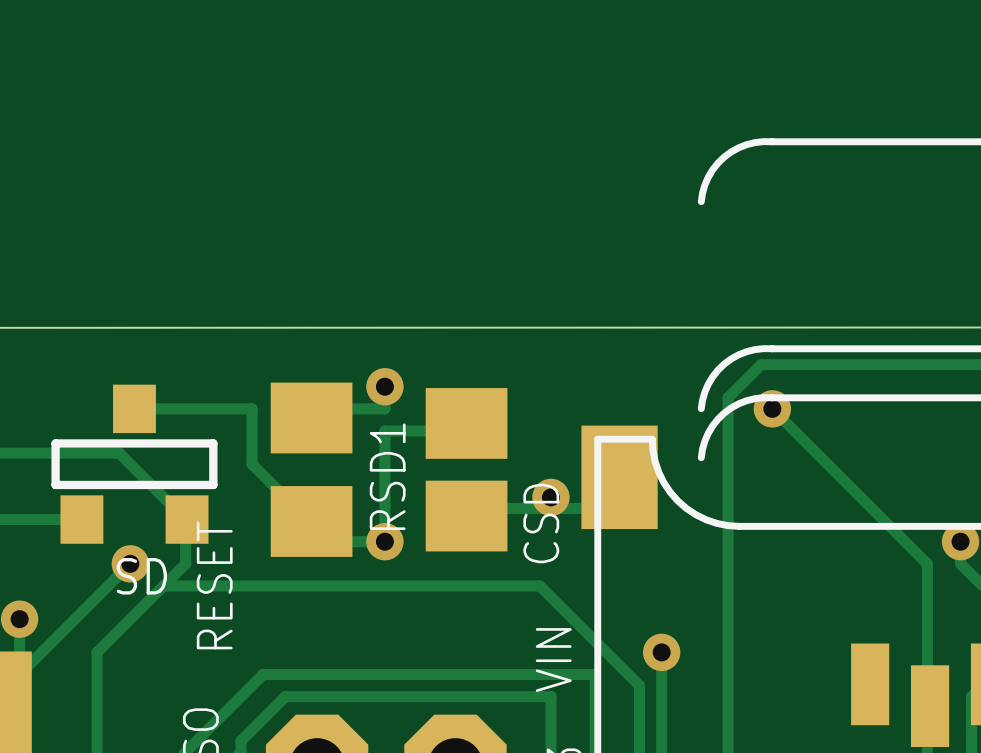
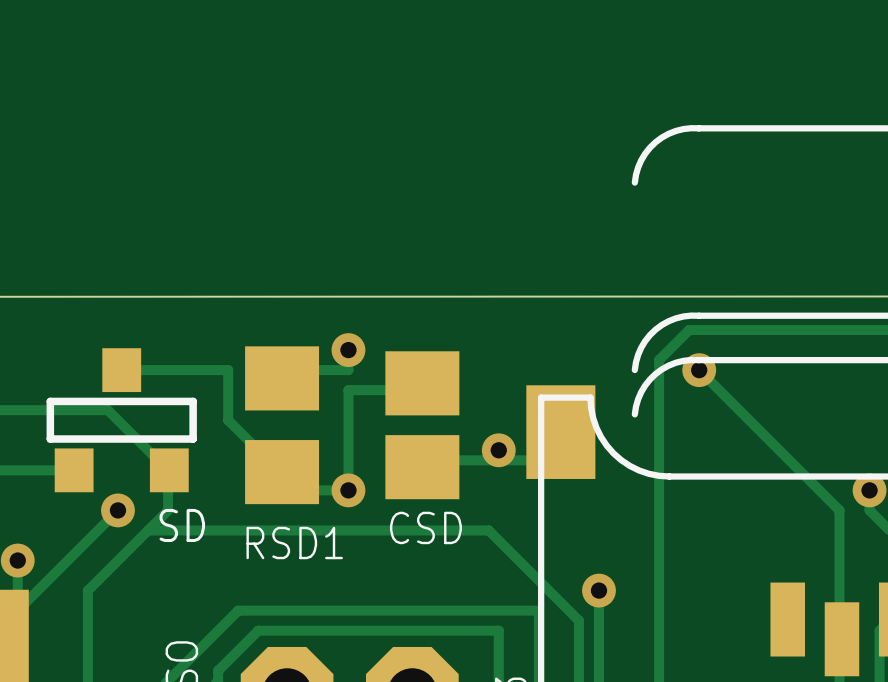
RSD1 name rotation: 0° (387, 476) -> 90° clockwise (294, 542)
RSD1 name position: RSD1 (387, 476) -> RSD1 (294, 542)
CSD name rotation: 0° (541, 523) -> 90° clockwise (425, 527)
SD name position: SD (141, 576) -> SD (182, 525)
text: RESET (214, 585) -> none
text: VIN (553, 660) -> none

